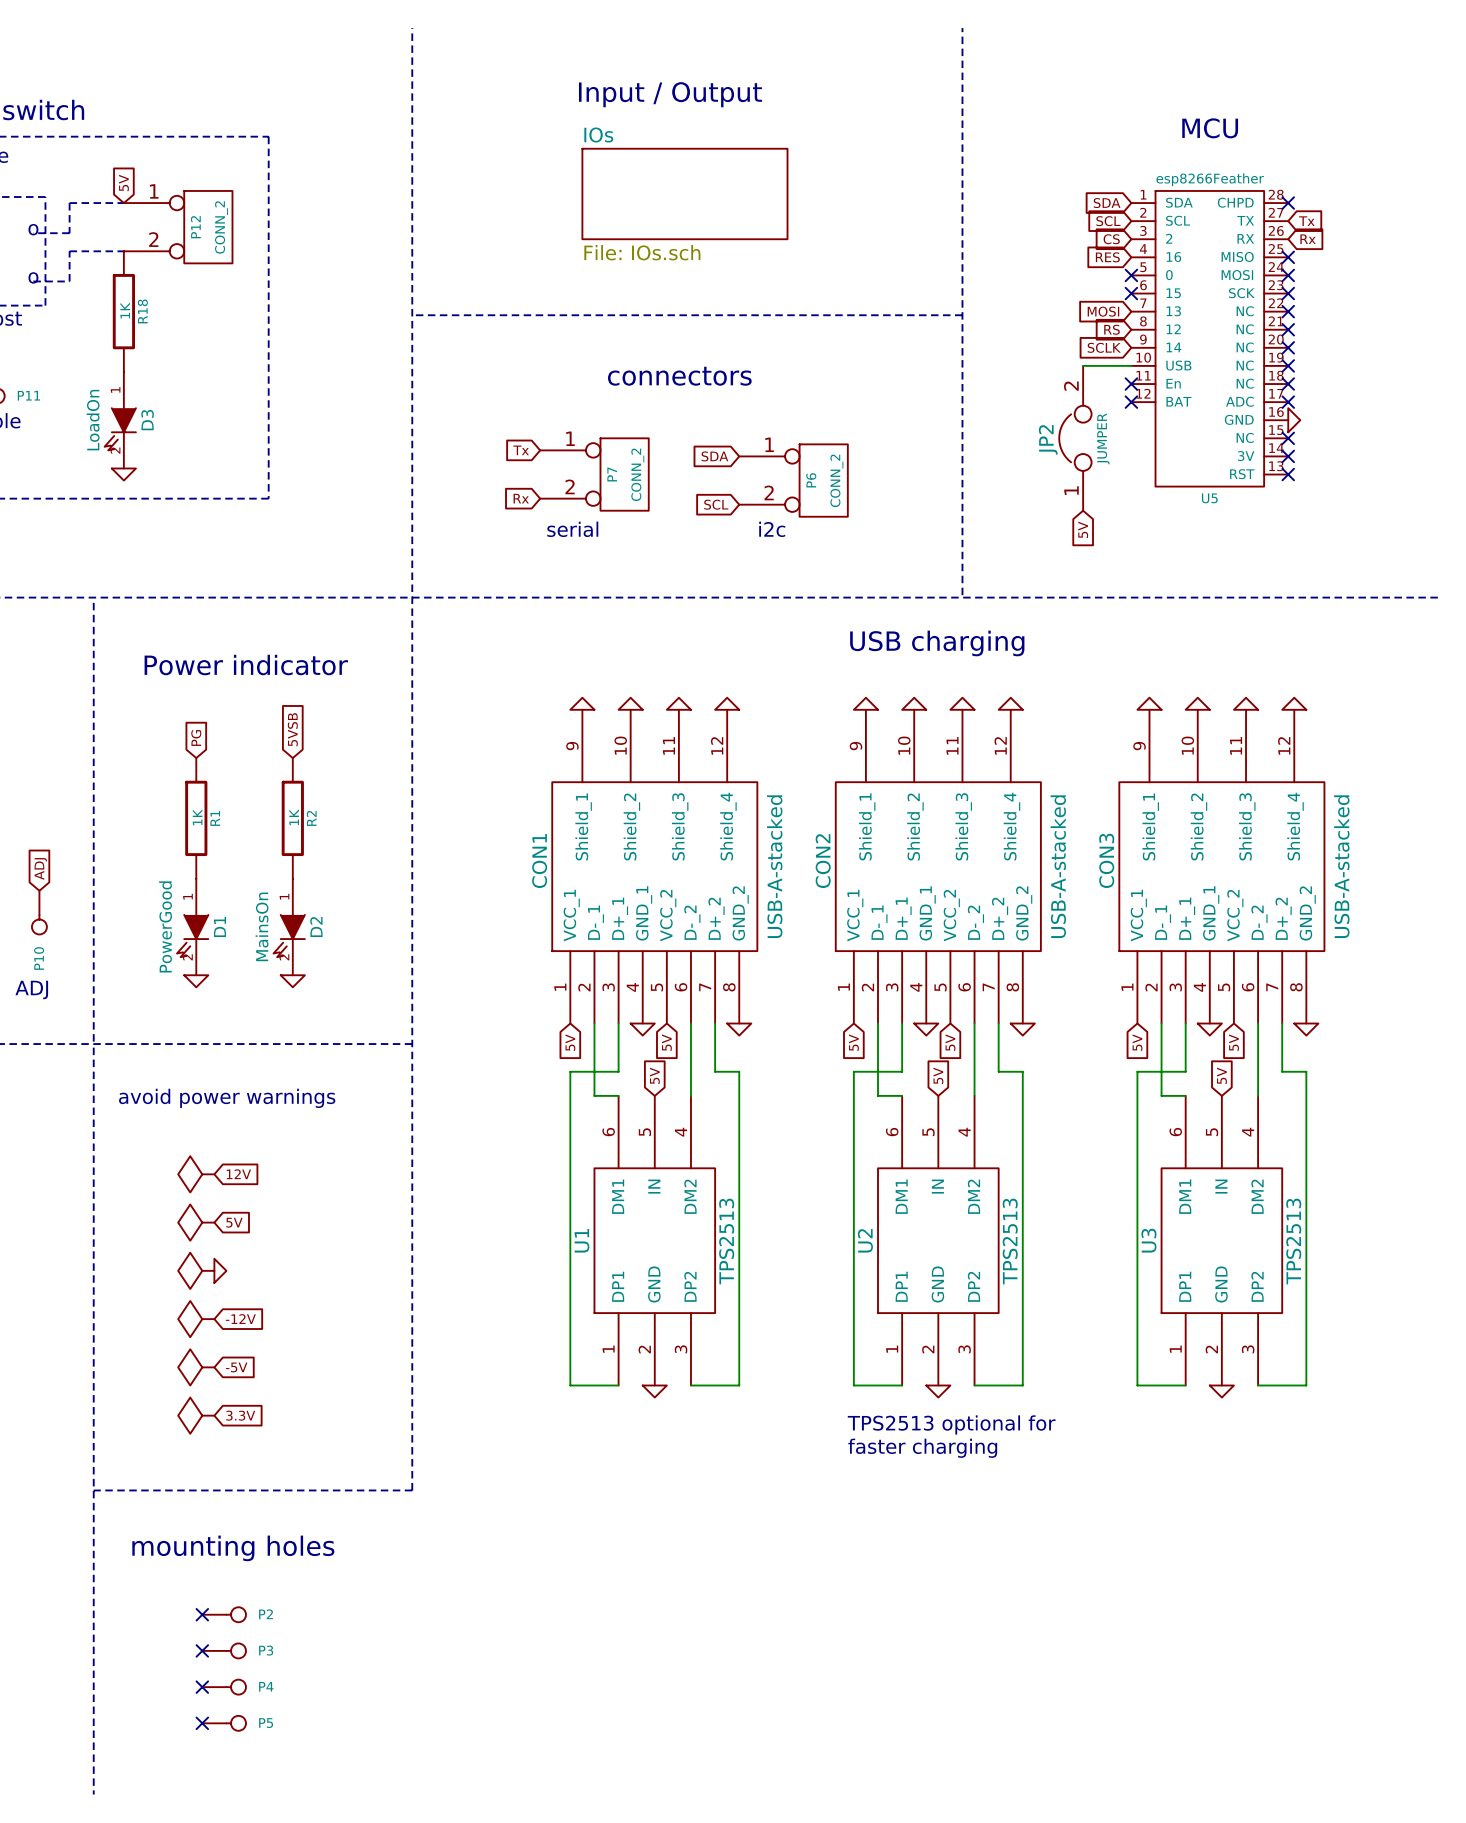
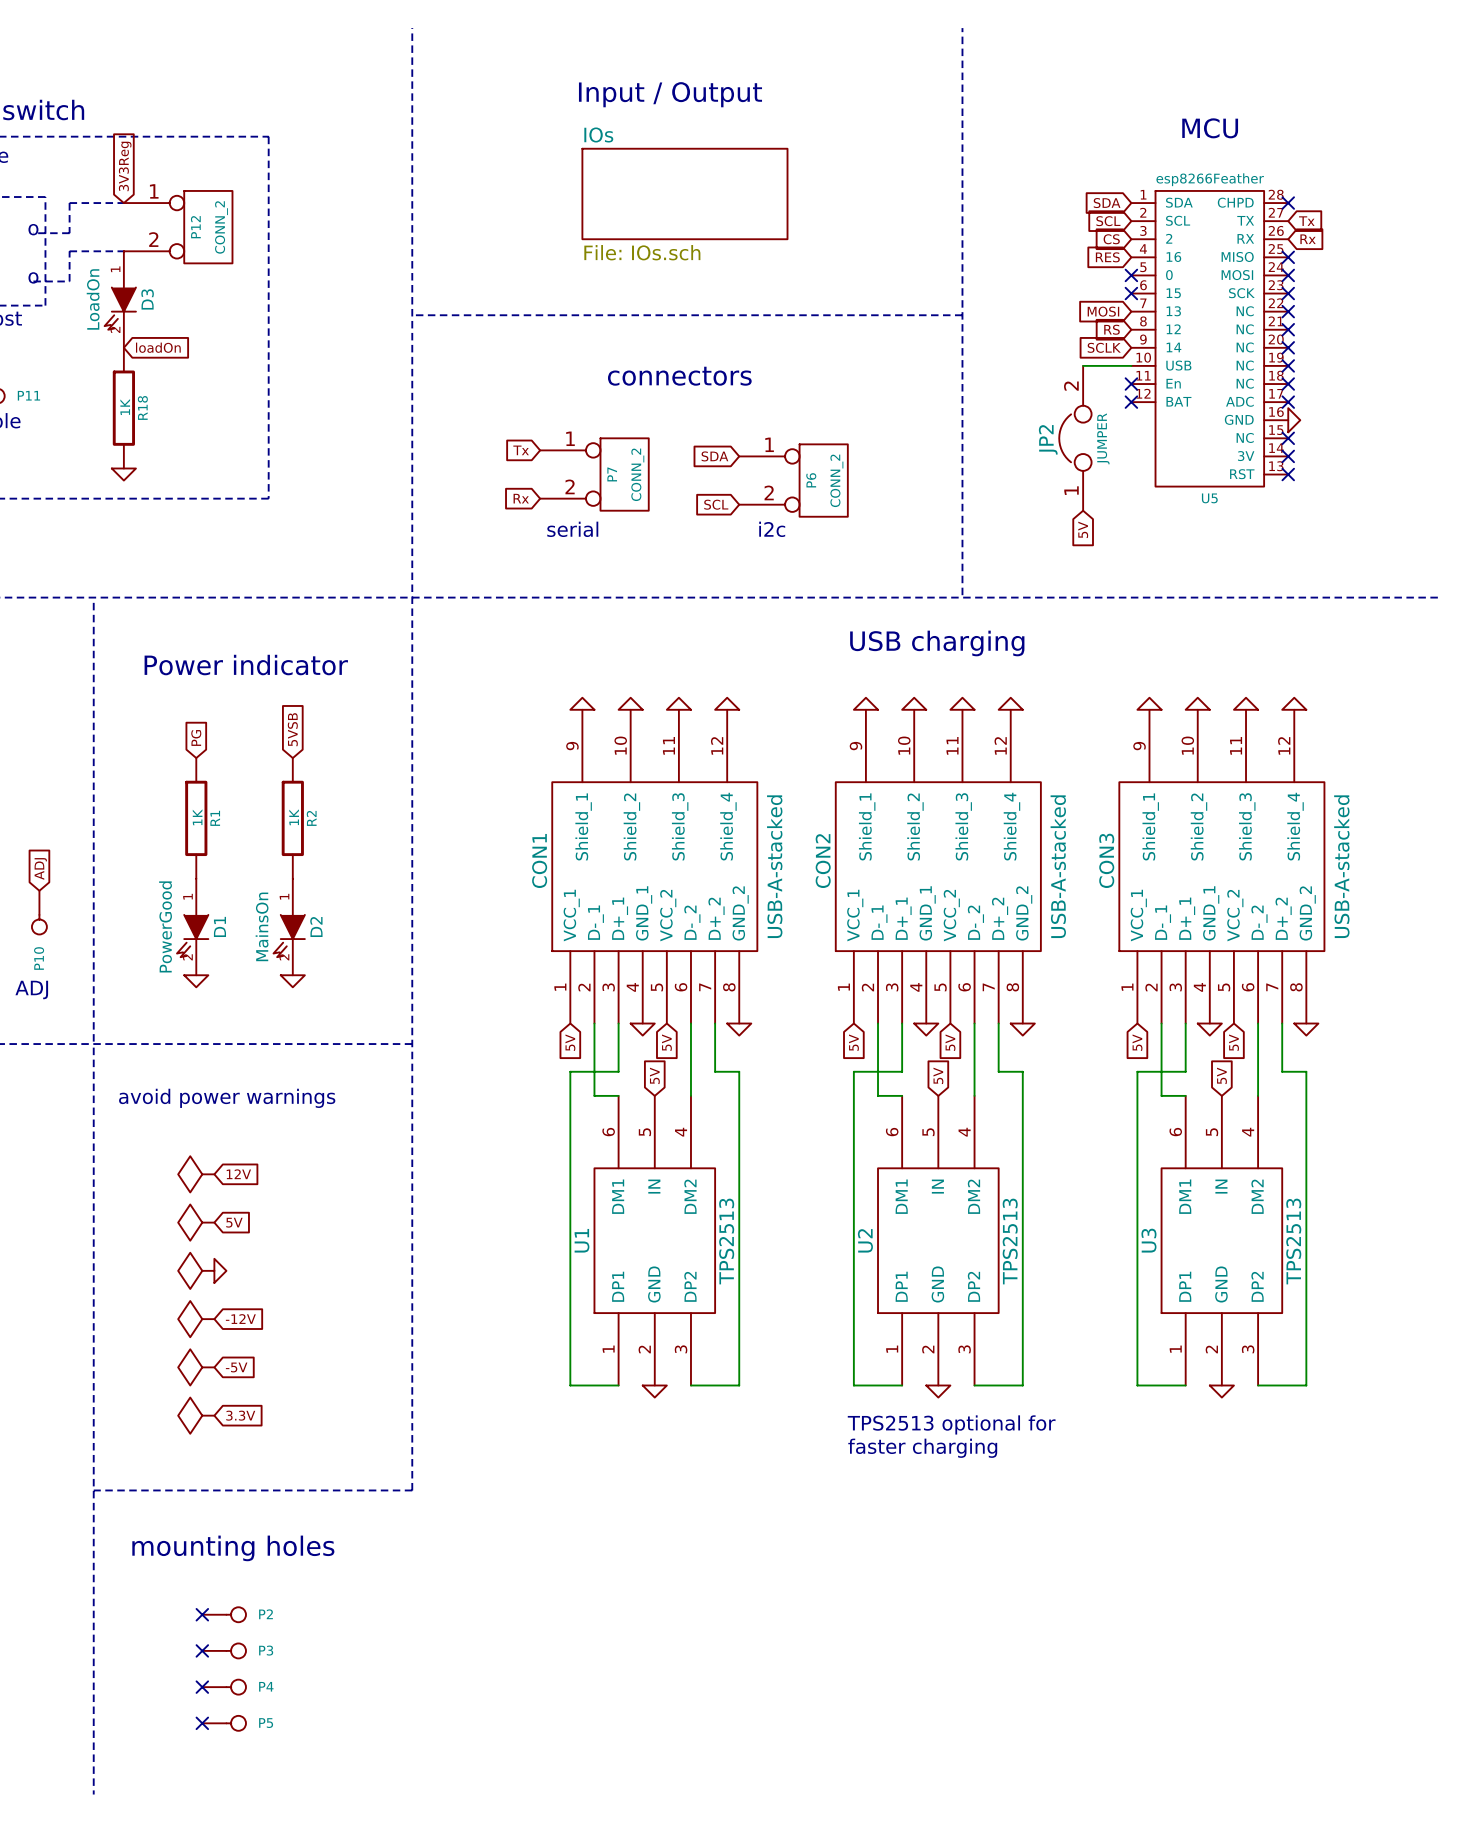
global label: 5V (123, 182) -> 3V3Reg (125, 166)
R18 position: (123, 311) -> (123, 408)
global label: none -> loadOn (158, 347)
D3 position: (120, 420) -> (120, 299)

